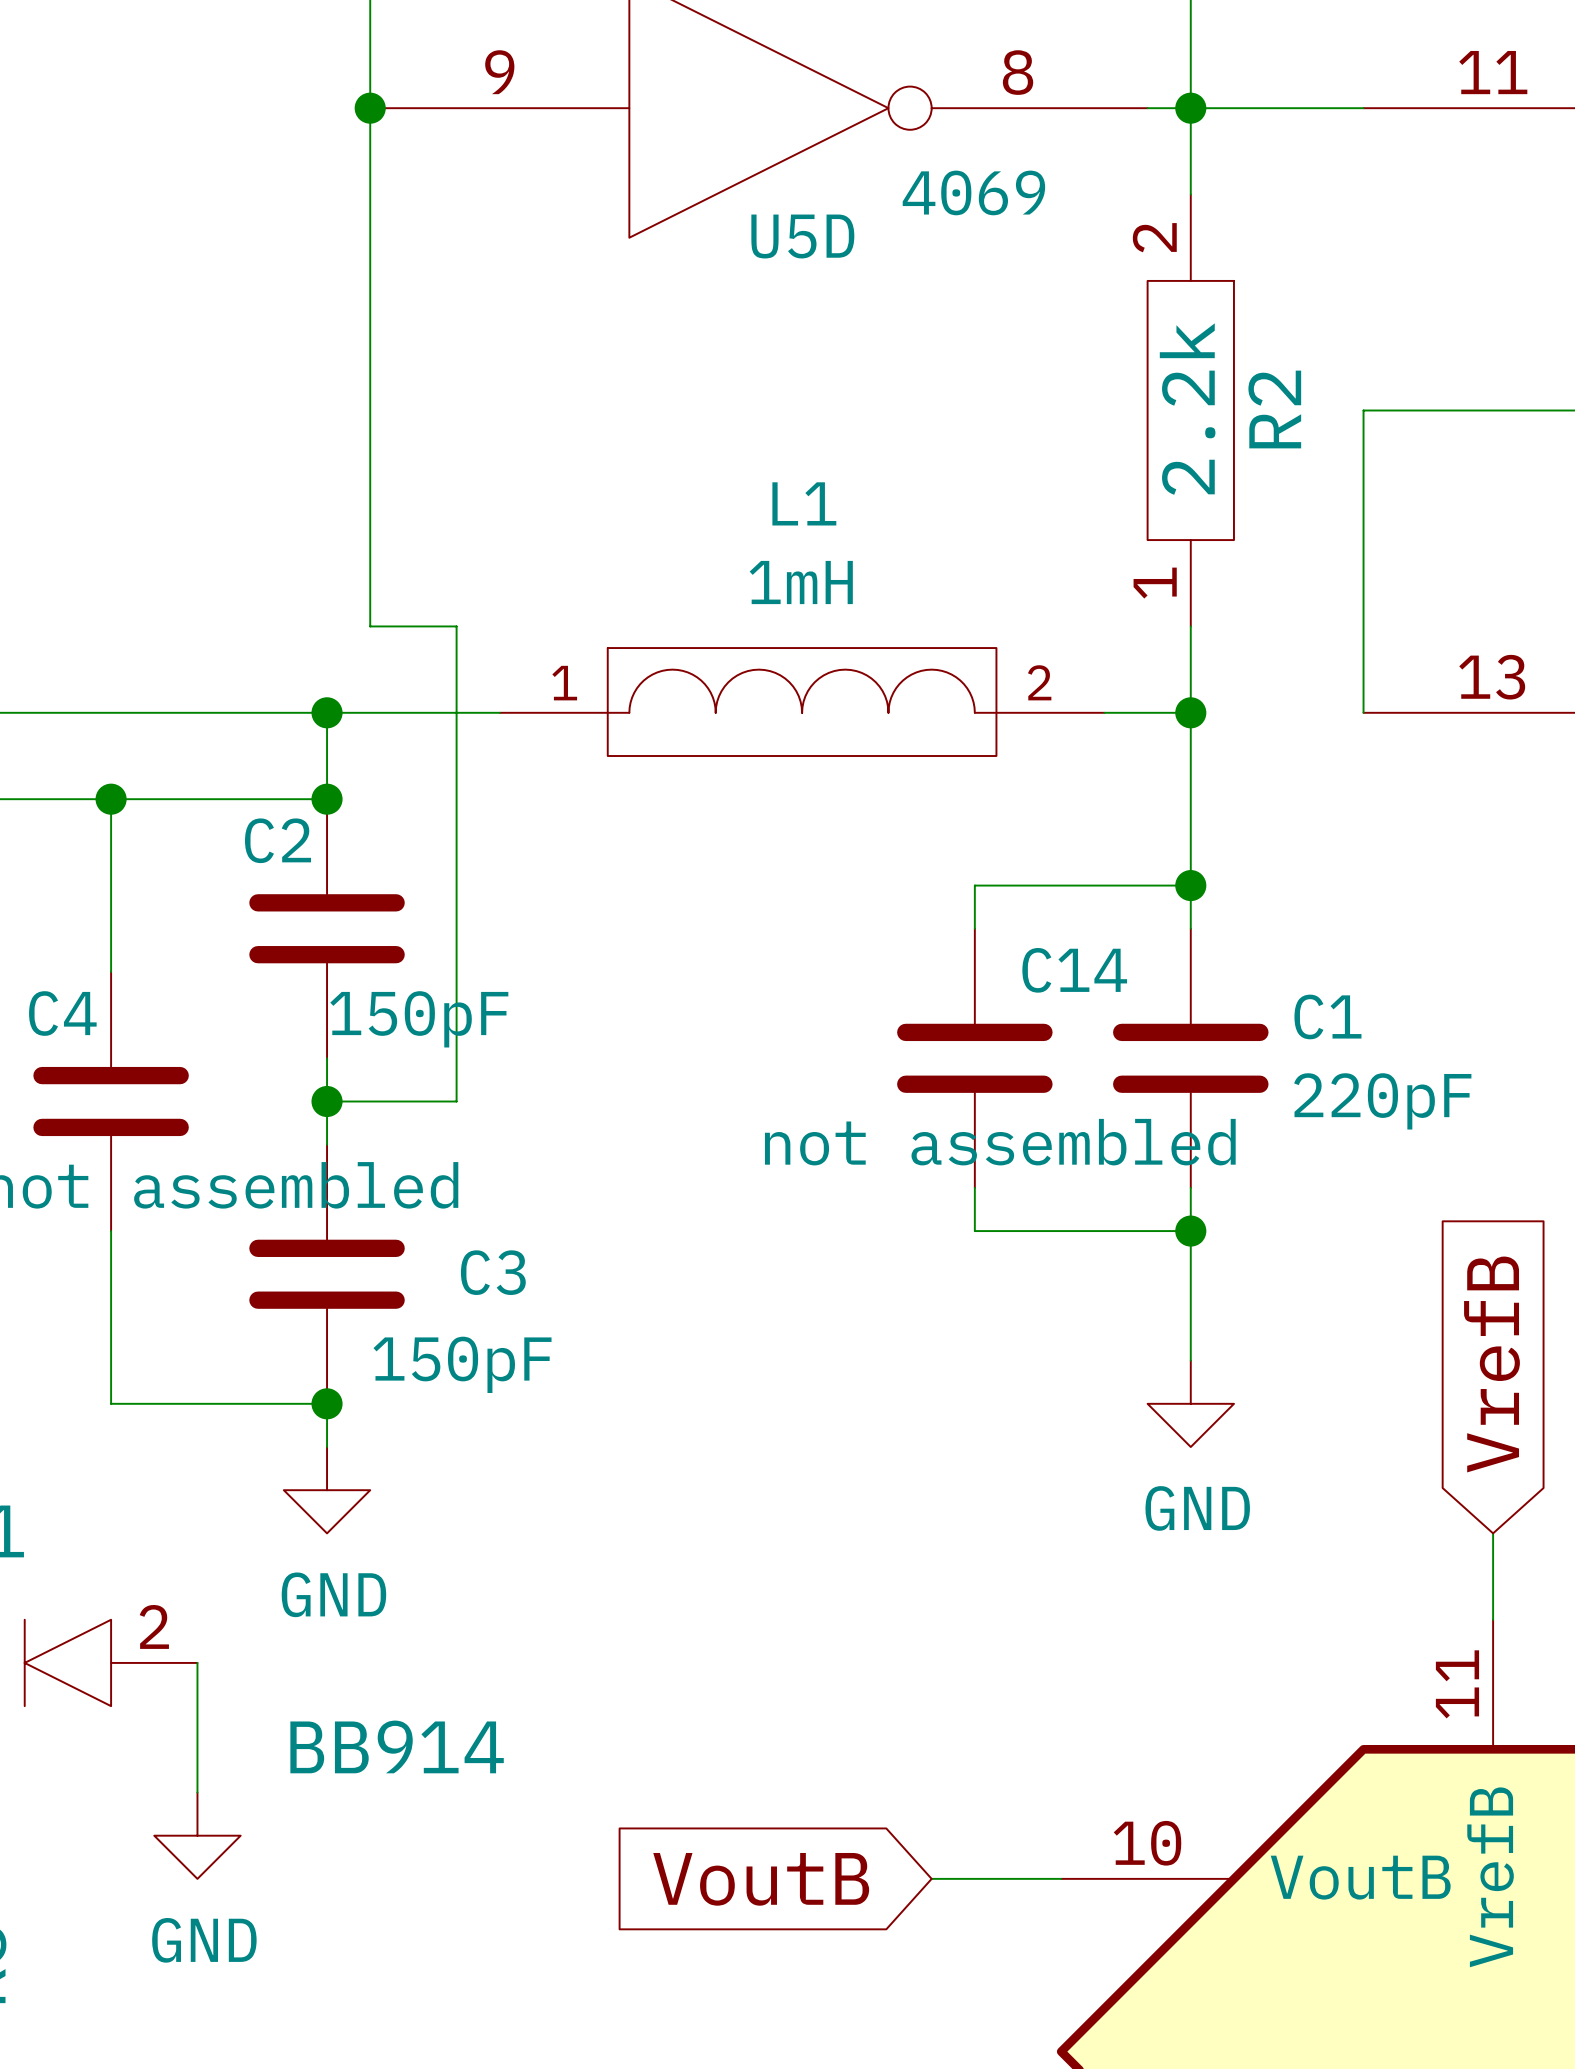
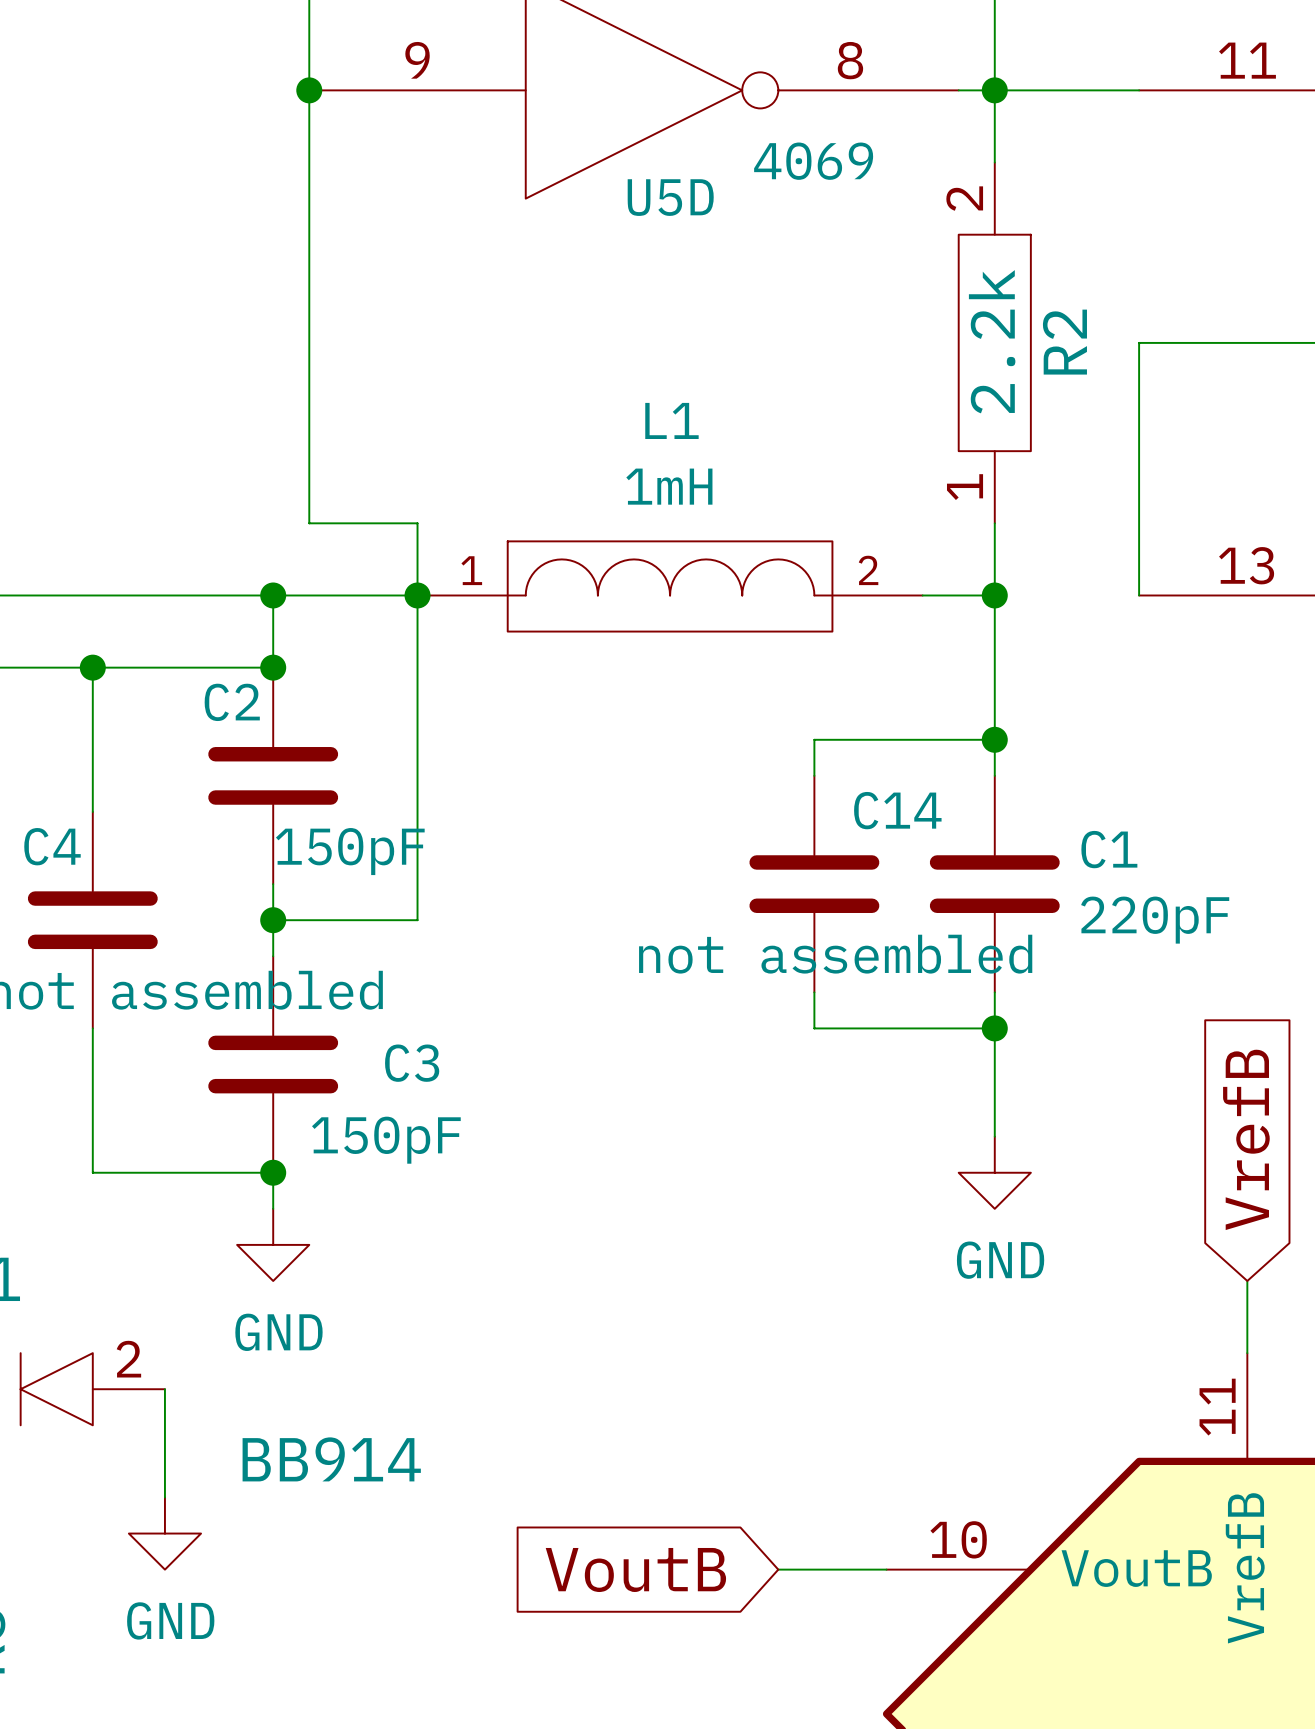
wire: (456, 626) (456, 1101) -> (381, 523) (417, 523) (417, 920) (381, 920)
junction: none -> (417, 595)

